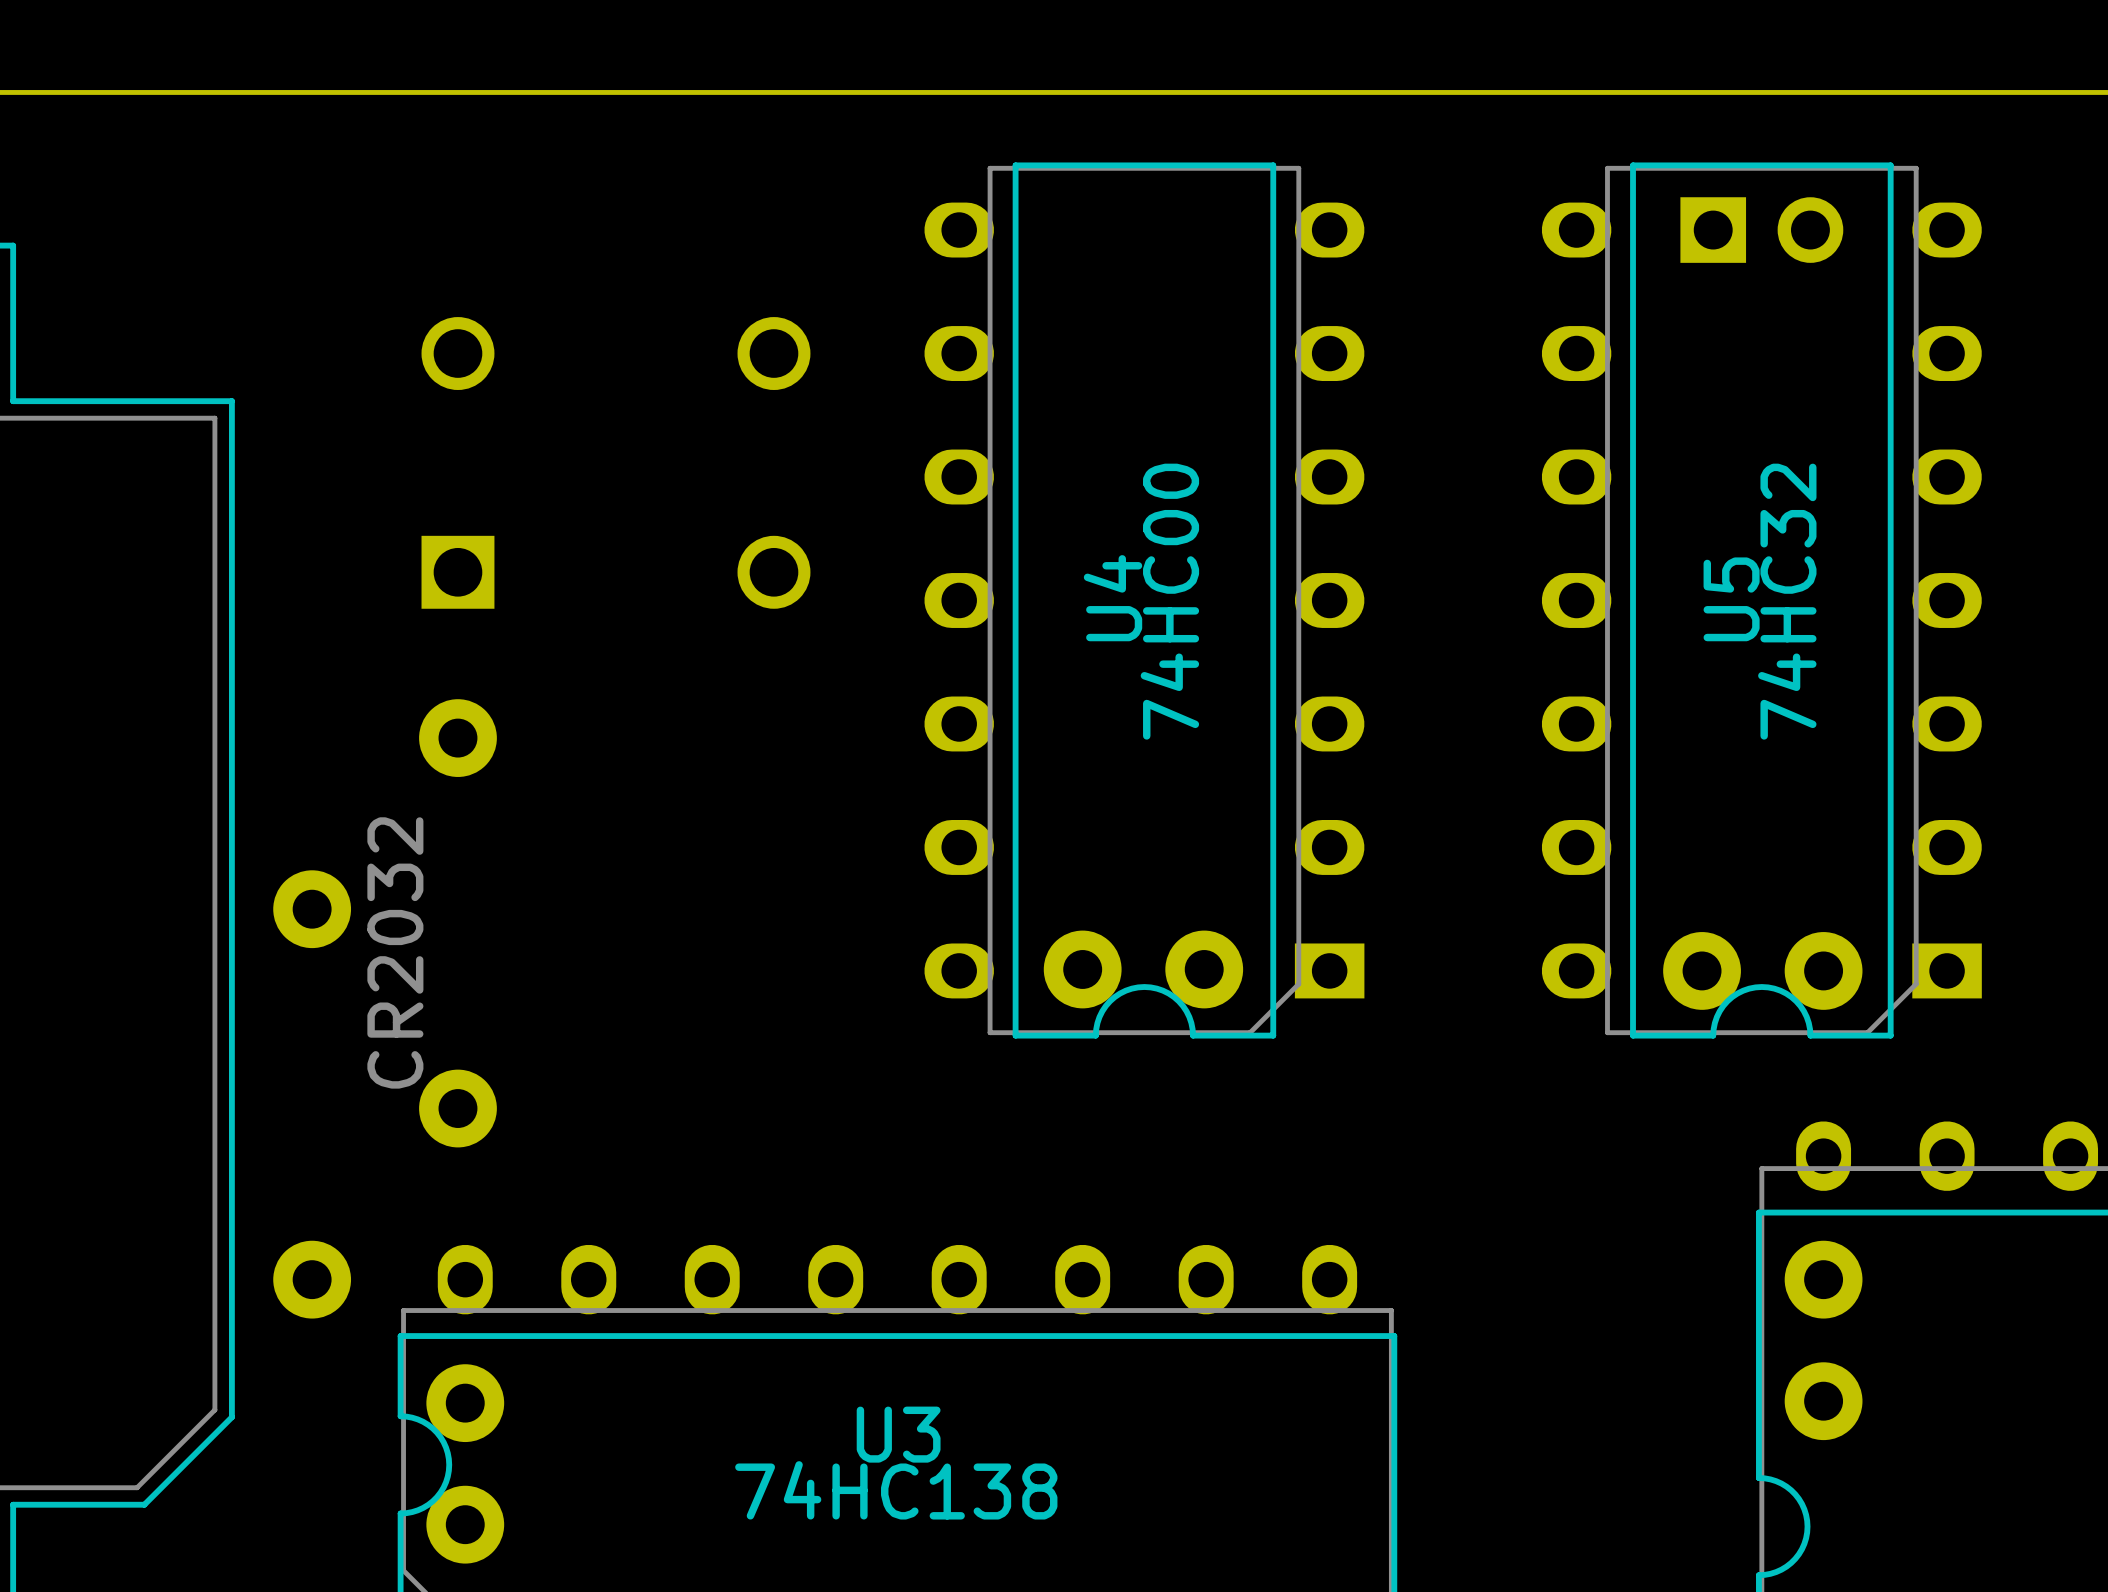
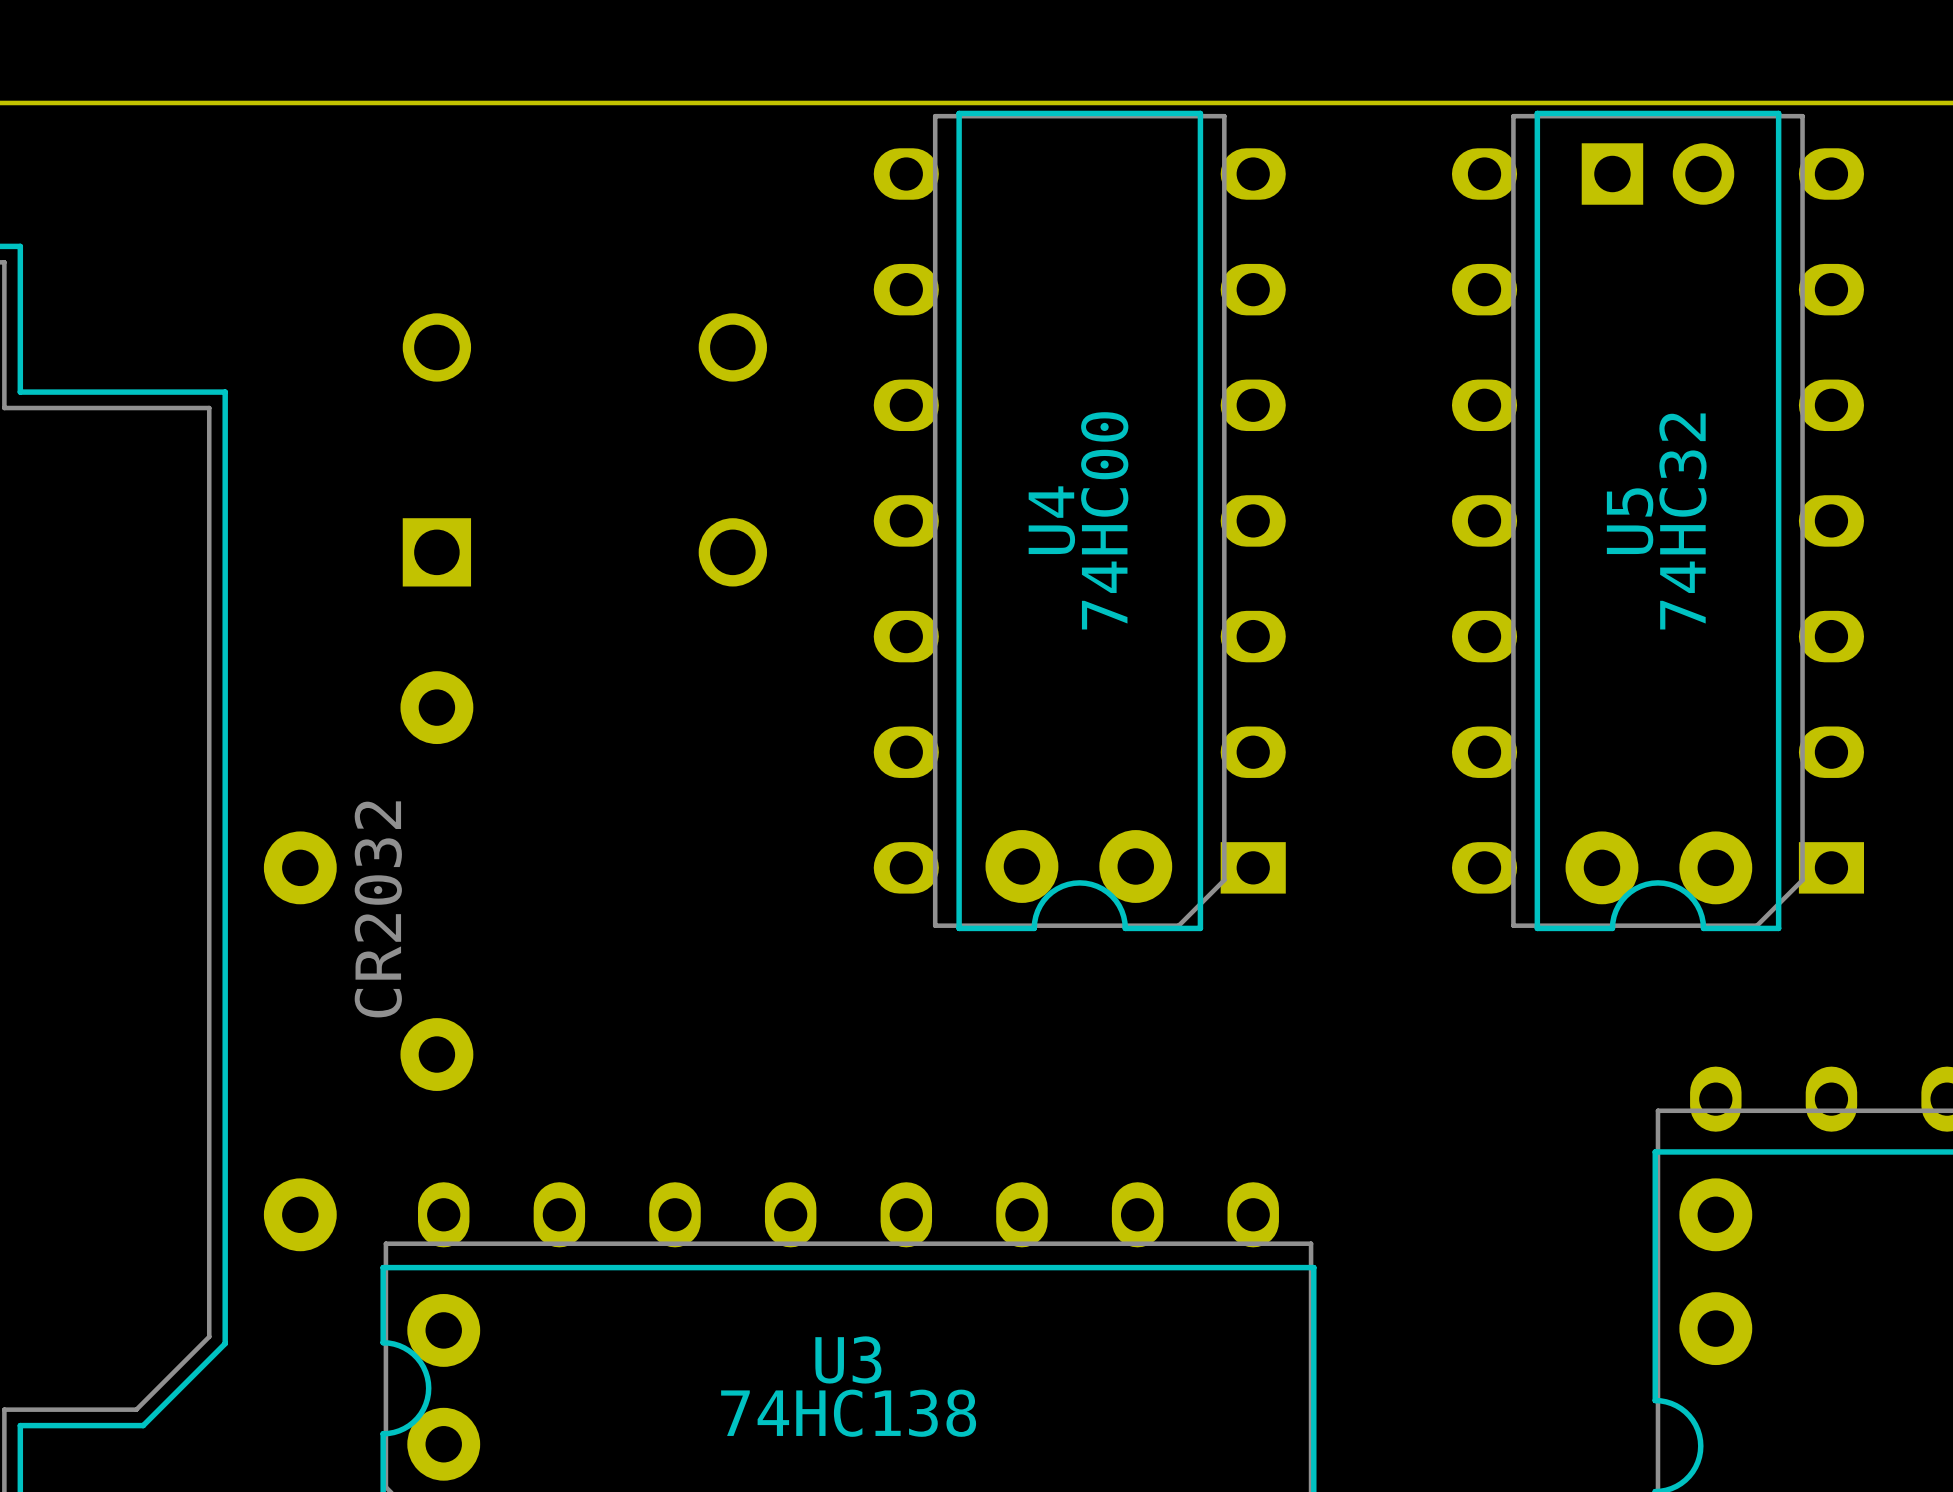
part position: (1761, 230) -> (1657, 174)
U4 position: (1144, 600) -> (1079, 520)
U5 position: (1761, 600) -> (1657, 520)
part position: (1143, 969) -> (1078, 866)
part position: (1762, 970) -> (1658, 867)

